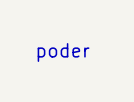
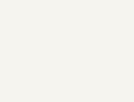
text: poder (63, 52) -> none

